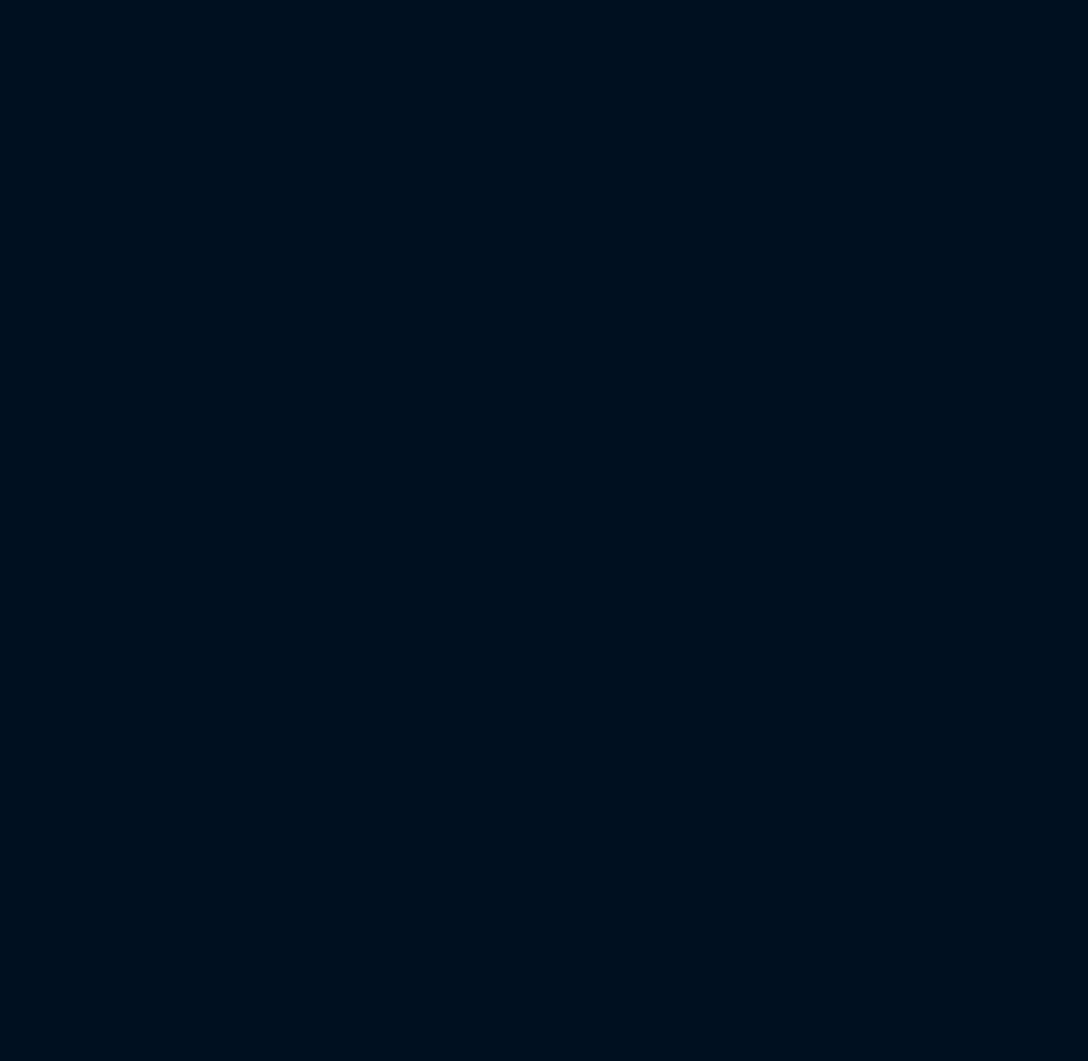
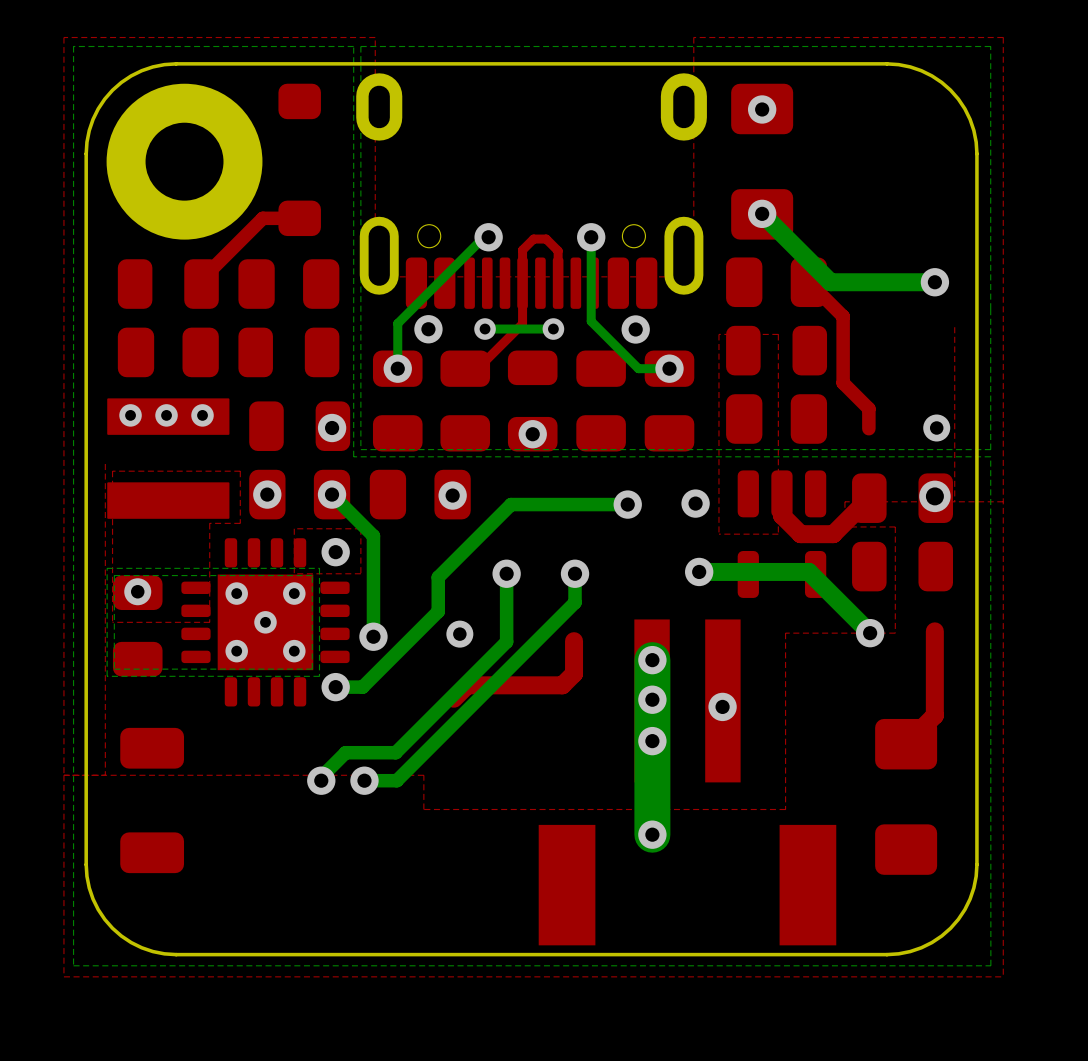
top zone outline: none -> (1003, 37) (693, 37) (693, 276) (375, 276) (375, 37) (63, 37) (63, 976) (1003, 976) (1003, 37)
bottom zone outline: none -> (353, 46) (73, 46) (73, 965) (990, 965) (990, 456) (353, 456) (353, 46)
bottom zone outline: none -> (990, 46) (990, 449) (360, 449) (360, 46) (990, 46)
board edge: none -> (886, 63) (176, 63) (164, 64) (141, 70) (121, 82) (112, 90) (98, 108) (93, 119) (86, 142) (86, 153) (86, 864) (86, 876) (93, 899) (98, 909) (112, 928) (121, 936) (141, 947) (164, 953) (176, 954) (886, 954) (898, 953) (921, 947) (941, 936) (950, 928) (958, 919) (970, 899) (976, 876) (976, 864) (976, 142) (970, 119) (964, 108) (958, 99) (941, 82) (921, 70) (910, 66) (886, 63)
via: none -> (762, 109)
part: none -> (299, 159)
part: none -> (184, 161)
part: none -> (762, 161)
part: none -> (531, 191)
bottom track: none -> (762, 213) (830, 282) (934, 282)
via: none -> (762, 213)
top track: none -> (299, 218) (262, 218) (203, 277)
bottom track: none -> (488, 237) (484, 237) (397, 323) (397, 368)
via: none -> (488, 237)
bottom track: none -> (591, 237) (591, 321) (638, 368) (669, 368)
via: none -> (591, 237)
part: none -> (776, 282)
top track: none -> (808, 282) (843, 316) (843, 383) (868, 408) (868, 428)
via: none -> (934, 282)
top track: none -> (558, 283) (558, 250) (546, 239) (533, 239) (522, 250) (522, 323) (477, 368)
part: none -> (168, 284)
part: none -> (288, 284)
top zone outline: none -> (954, 327) (954, 501)
via: none -> (428, 329)
via: none -> (485, 329)
bottom track: none -> (553, 329) (485, 329)
via: none -> (553, 329)
via: none -> (635, 329)
top zone outline: none -> (778, 334) (718, 334) (718, 534) (778, 534) (778, 334)
part: none -> (776, 350)
part: none -> (168, 352)
part: none -> (288, 352)
via: none -> (397, 368)
via: none -> (669, 368)
part: none -> (397, 401)
part: none -> (465, 401)
part: none -> (532, 401)
part: none -> (601, 401)
part: none -> (669, 401)
via: none -> (130, 415)
via: none -> (166, 415)
via: none -> (202, 415)
part: none -> (776, 419)
part: none -> (299, 426)
via: none -> (332, 428)
via: none -> (936, 428)
via: none -> (532, 434)
part: none -> (168, 458)
top zone outline: none -> (105, 463) (105, 775)
top zone outline: none -> (240, 471) (240, 523) (209, 523) (209, 622) (112, 622) (112, 471) (240, 471)
top track: none -> (781, 493) (781, 515) (800, 534) (833, 534) (869, 498)
via: none -> (267, 494)
part: none -> (299, 494)
bottom track: none -> (332, 494) (373, 536) (373, 636)
via: none -> (332, 494)
part: none -> (420, 494)
via: none -> (452, 495)
via: none -> (934, 496)
part: none -> (902, 498)
top zone outline: none -> (1003, 501) (844, 501) (844, 526) (895, 526) (895, 633) (785, 633) (785, 809) (423, 809) (423, 775) (63, 775)
via: none -> (695, 503)
bottom track: none -> (627, 504) (511, 504) (438, 577) (438, 611) (362, 687) (335, 687)
via: none -> (627, 504)
top zone outline: none -> (360, 528) (360, 573) (294, 573) (294, 528) (360, 528)
part: none -> (781, 534)
via: none -> (335, 552)
part: none -> (902, 566)
bottom zone outline: none -> (319, 568) (319, 676) (107, 676) (107, 568) (319, 568)
bottom track: none -> (699, 571) (808, 571) (870, 633)
via: none -> (699, 571)
bottom track: none -> (506, 573) (506, 641) (395, 752) (345, 752) (321, 777) (321, 780)
via: none -> (506, 573)
bottom track: none -> (575, 573) (575, 602) (396, 780) (364, 780)
via: none -> (575, 573)
bottom zone outline: none -> (312, 575) (312, 669) (114, 669) (114, 575) (312, 575)
via: none -> (137, 591)
via: none -> (236, 593)
via: none -> (294, 593)
part: none -> (265, 622)
via: none -> (265, 622)
part: none -> (137, 625)
top track: none -> (934, 631) (934, 715) (906, 744)
via: none -> (870, 633)
via: none -> (459, 634)
via: none -> (373, 636)
top track: none -> (574, 641) (574, 673) (562, 685) (467, 685) (453, 698)
via: none -> (236, 651)
via: none -> (294, 651)
bottom track: none -> (652, 660) (652, 834)
via: none -> (652, 660)
via: none -> (335, 687)
via: none -> (652, 699)
via: none -> (722, 706)
via: none -> (652, 741)
via: none -> (321, 780)
via: none -> (364, 780)
part: none -> (687, 782)
part: none -> (906, 796)
part: none -> (152, 800)
via: none -> (652, 834)

